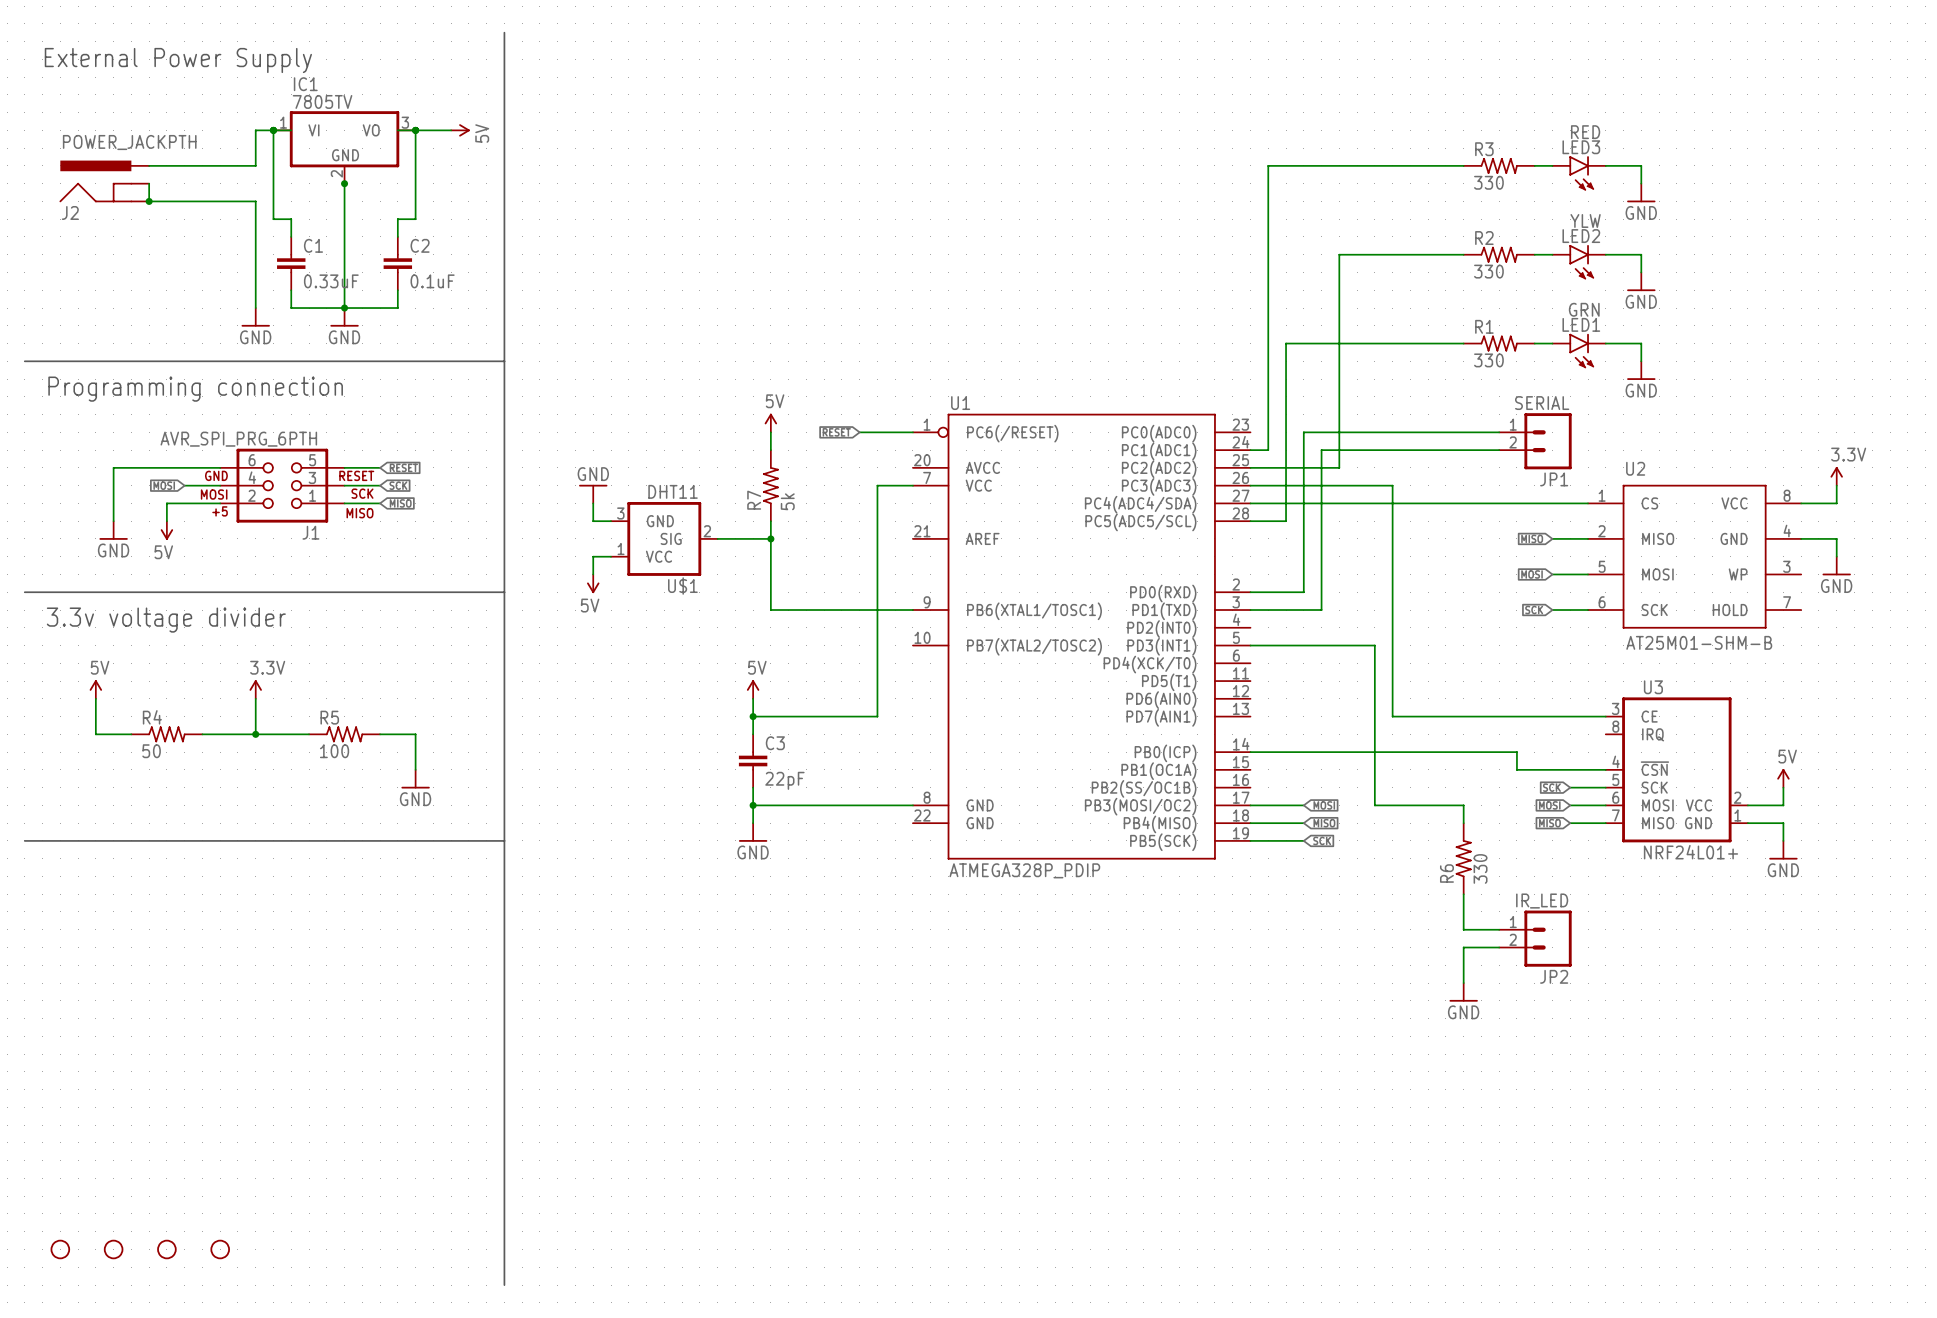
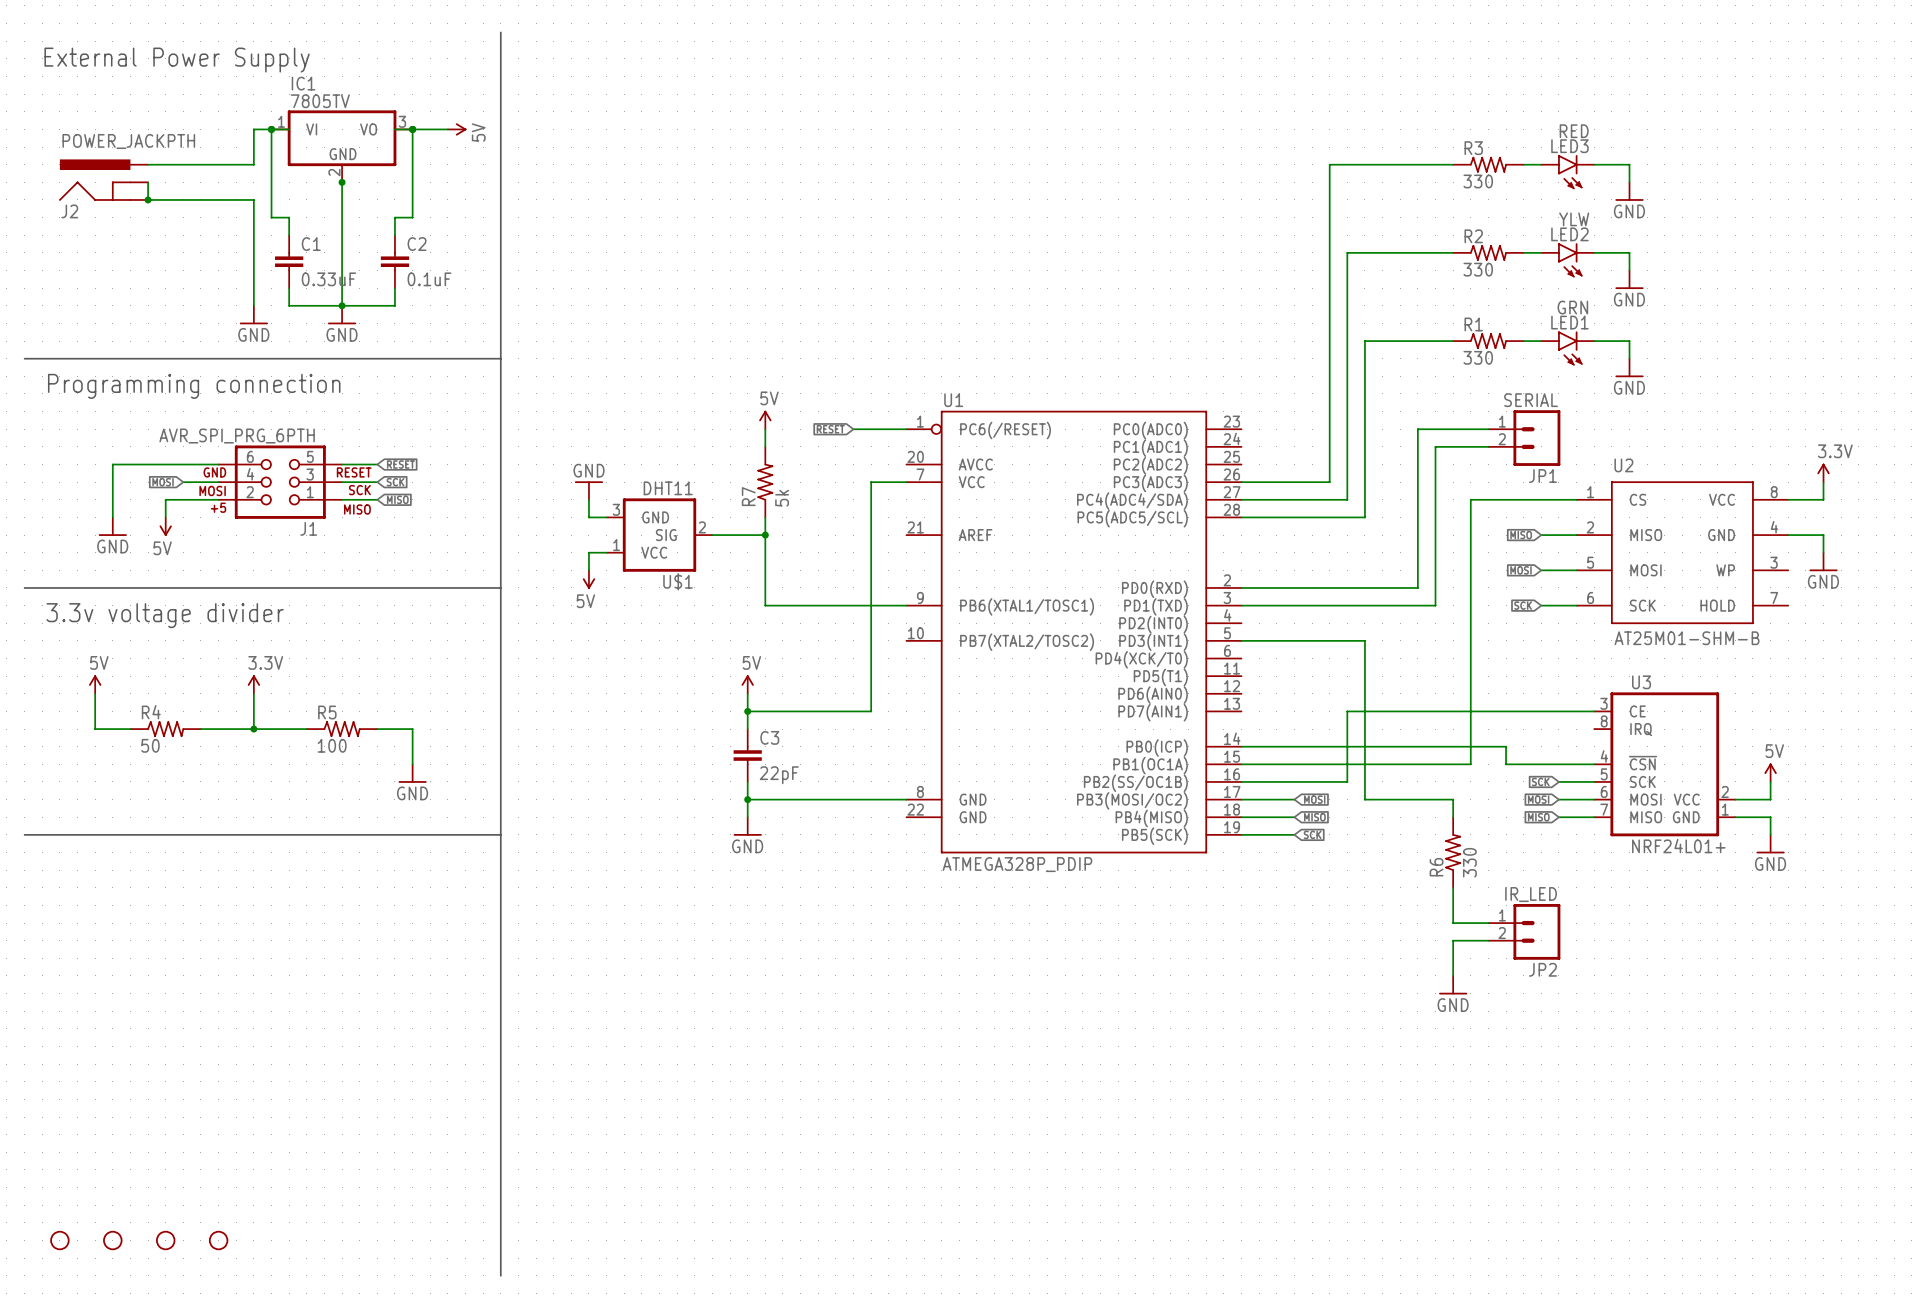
wire: (1339, 165) (1268, 165) (1268, 450) (1250, 450) -> none
wire: (1339, 254) (1357, 254) -> (1329, 252) (1329, 164)
wire: (1374, 343) (1286, 343) (1286, 521) -> (1364, 341) (1364, 517) (1276, 517)
wire: (1428, 432) (1303, 432) (1303, 592) -> (1417, 429) (1417, 587) (1294, 587)
wire: (1445, 450) (1321, 450) (1321, 610) -> (1435, 446) (1435, 605) (1312, 605)
wire: (1250, 467) (1339, 467) -> (1329, 482) (1329, 464)
wire: (1339, 485) (1392, 485) (1392, 716) -> (1241, 781) (1347, 781) (1347, 711) (1382, 711)
wire: (1357, 503) (1481, 503) -> (1347, 499) (1347, 252)
wire: none -> (1470, 499) (1470, 764) (1241, 764)

